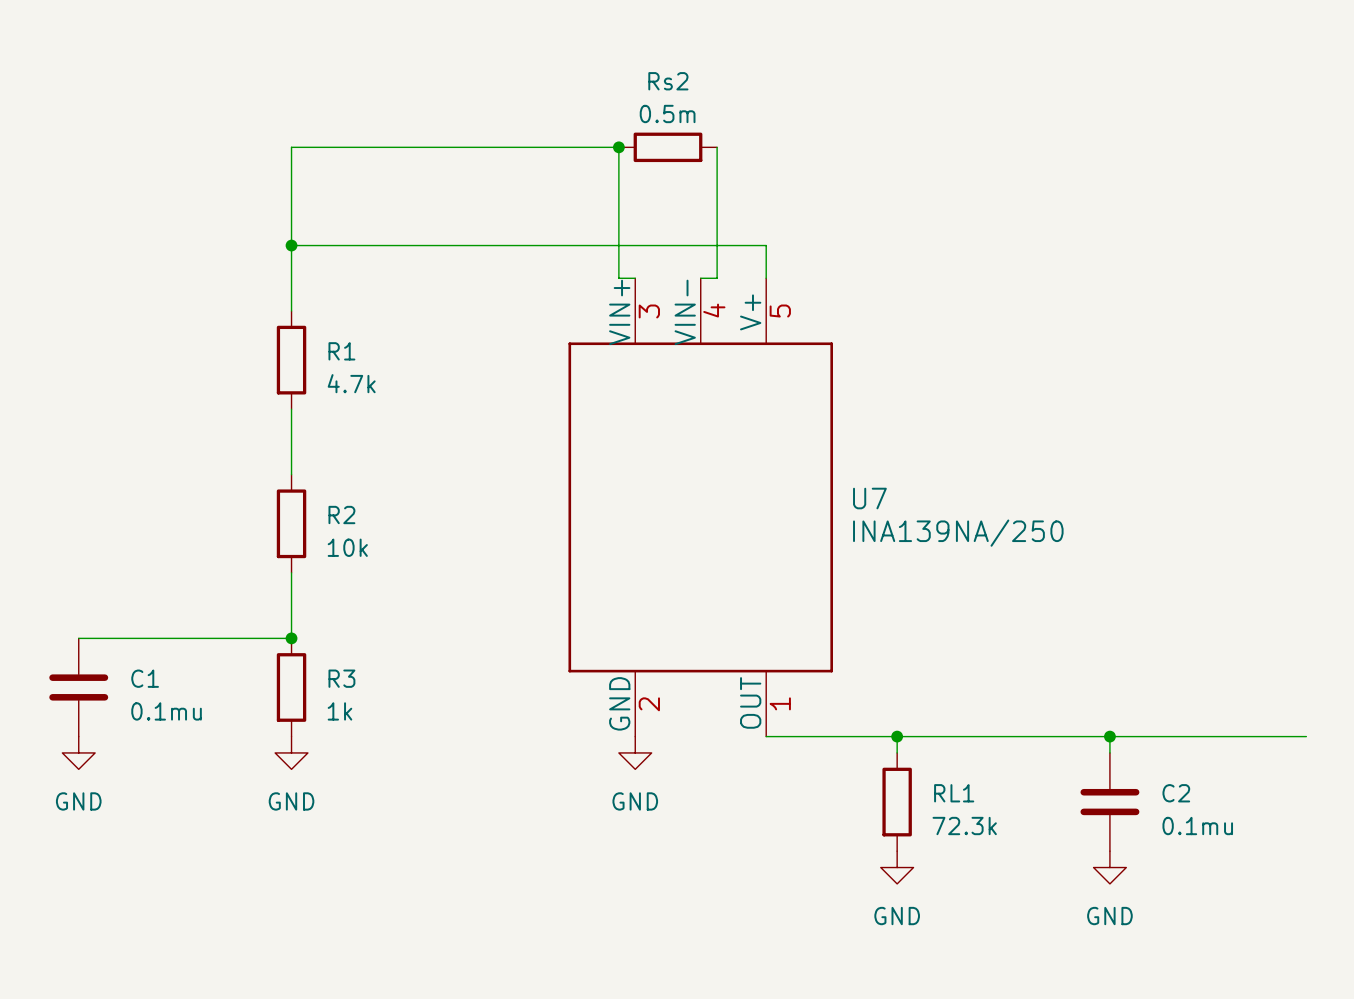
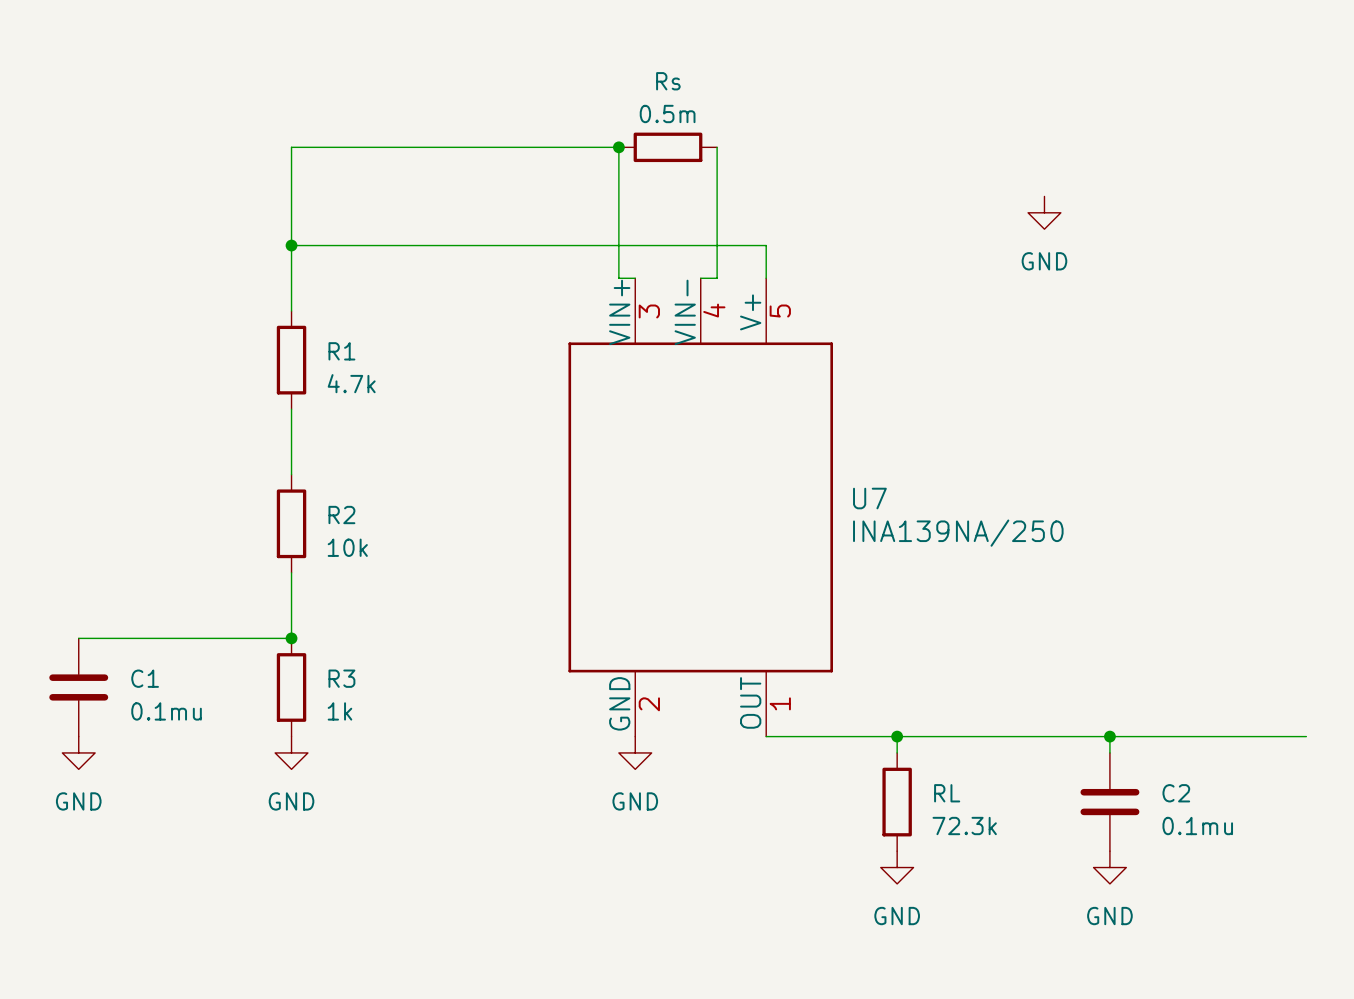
Rs2 name: Rs2 (668, 81) -> Rs (668, 81)
power symbol: none -> GND (1044, 212)
RL1 name: RL1 (954, 793) -> RL (947, 793)

